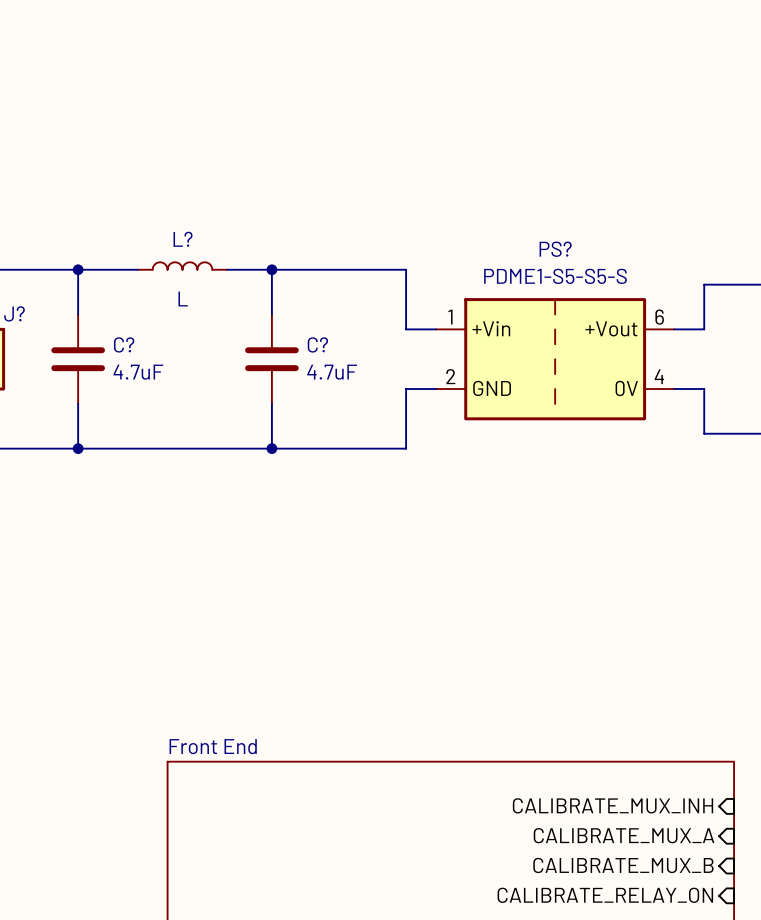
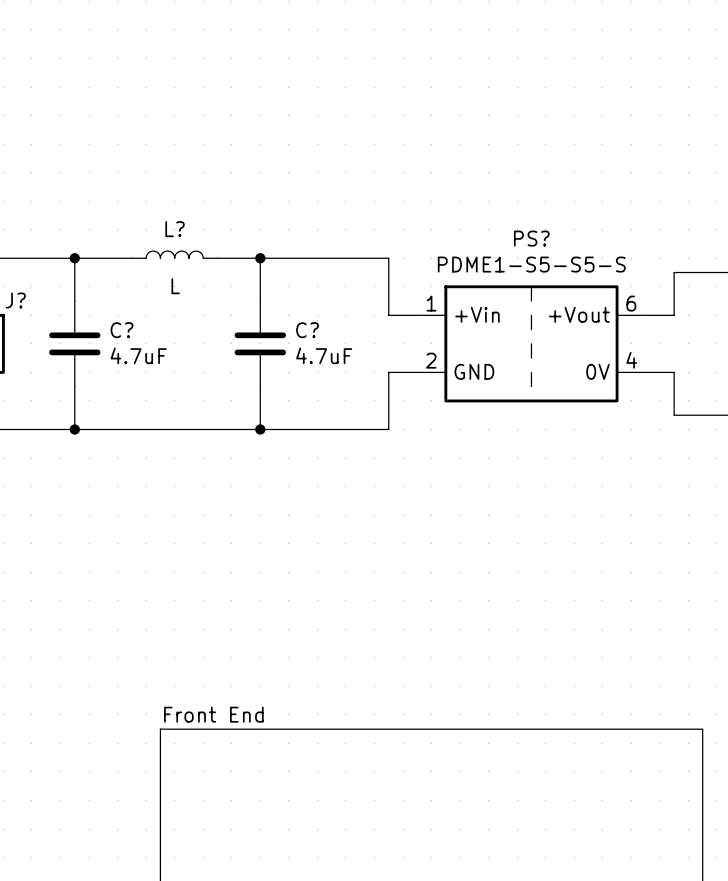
sheet pin: CALIBRATE_MUX_INH (613, 805) -> none
sheet pin: CALIBRATE_MUX_A (624, 835) -> none
sheet pin: CALIBRATE_MUX_B (623, 865) -> none
sheet pin: CALIBRATE_RELAY_ON (605, 895) -> none

